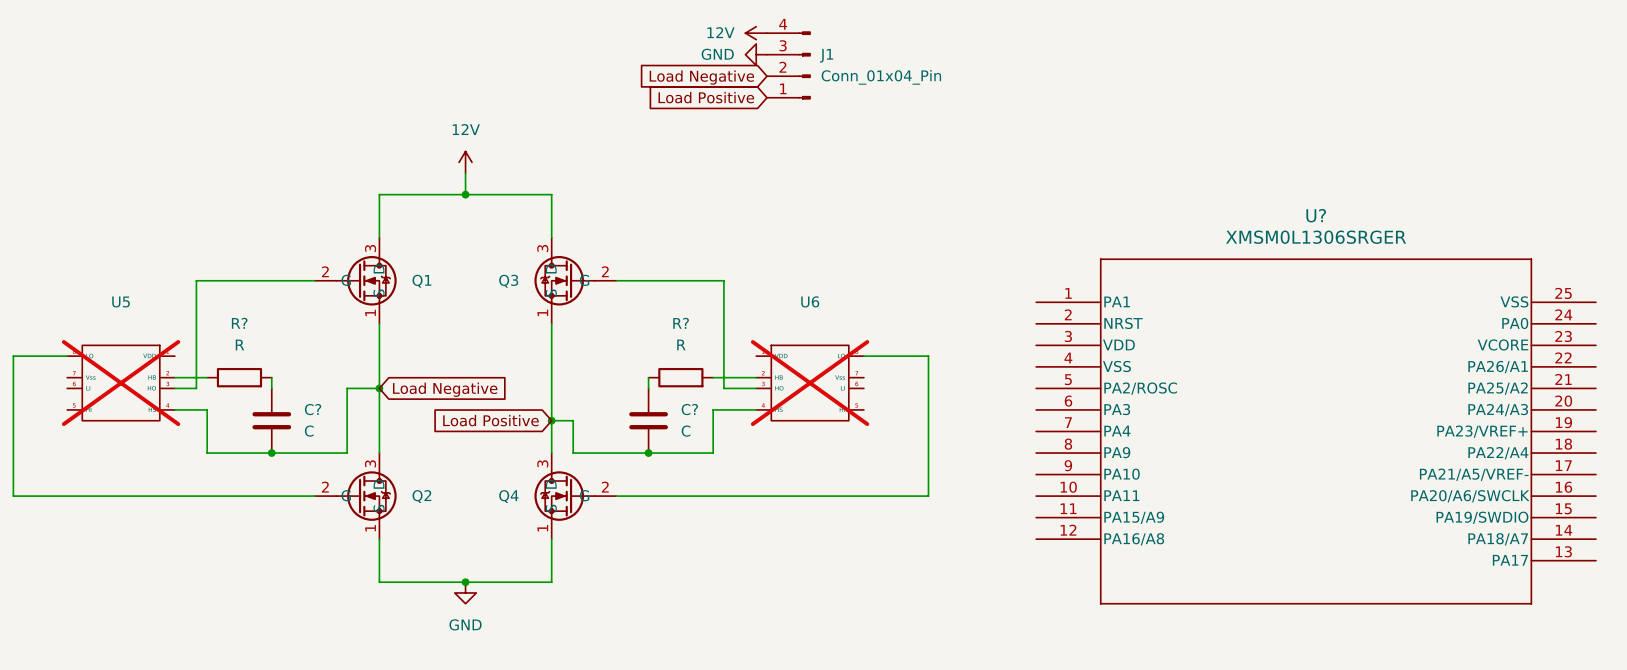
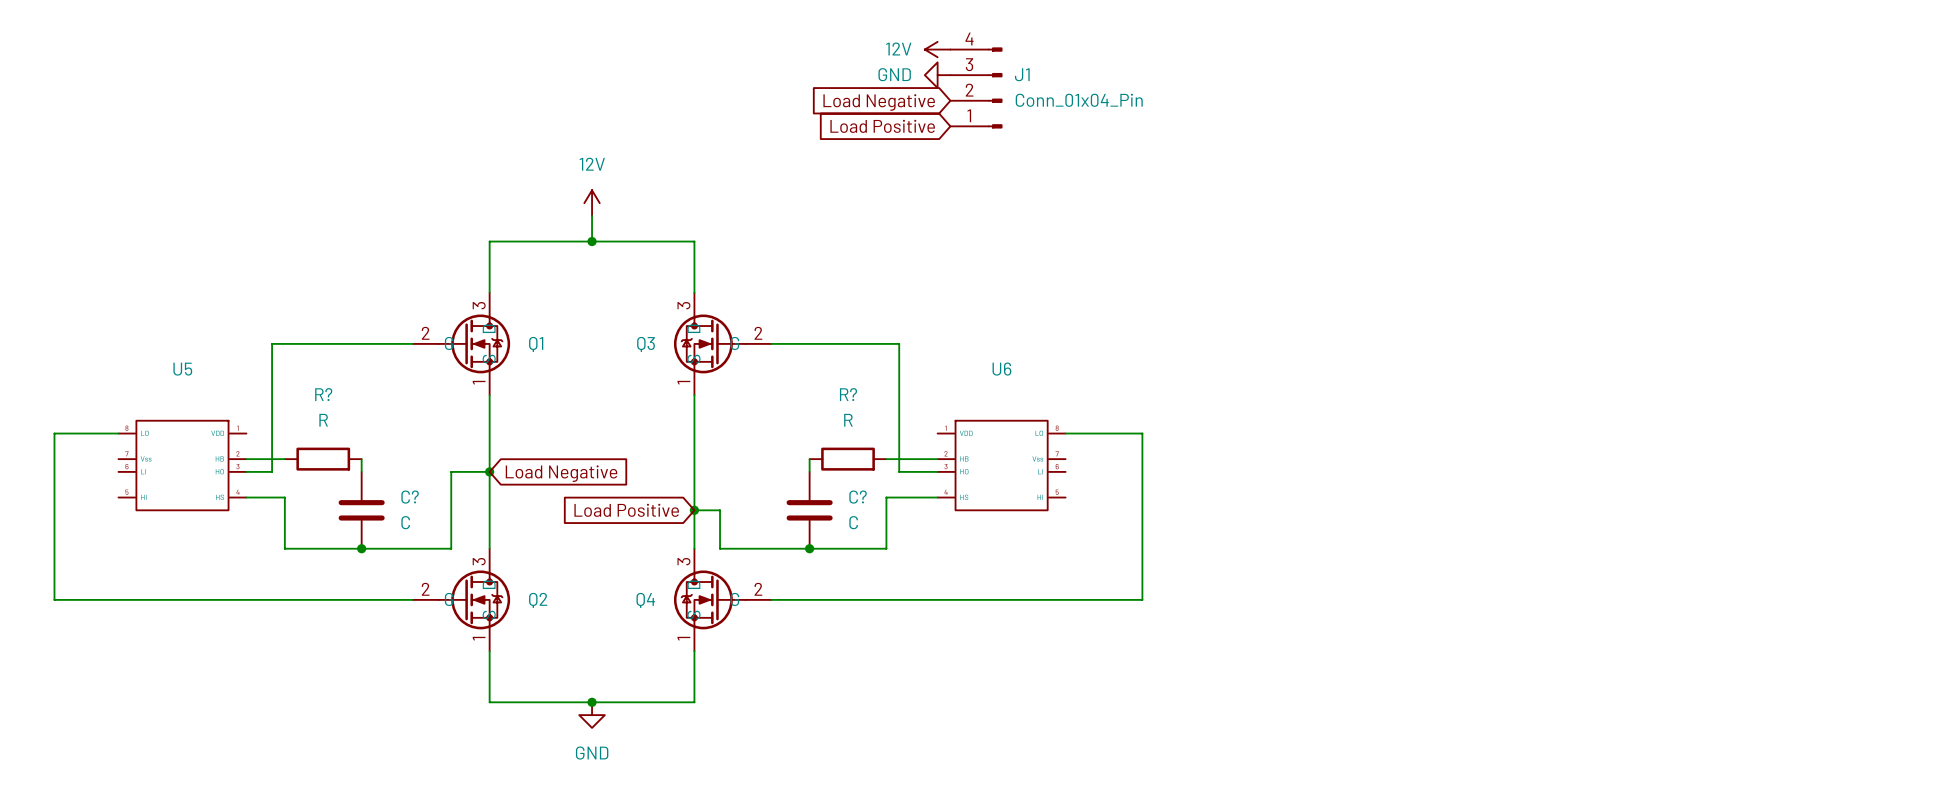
U5 do-not-place cross: (121, 383) -> none
U6 do-not-place cross: (810, 383) -> none
U?: XMSM0L1306SRGER (1316, 431) -> none

